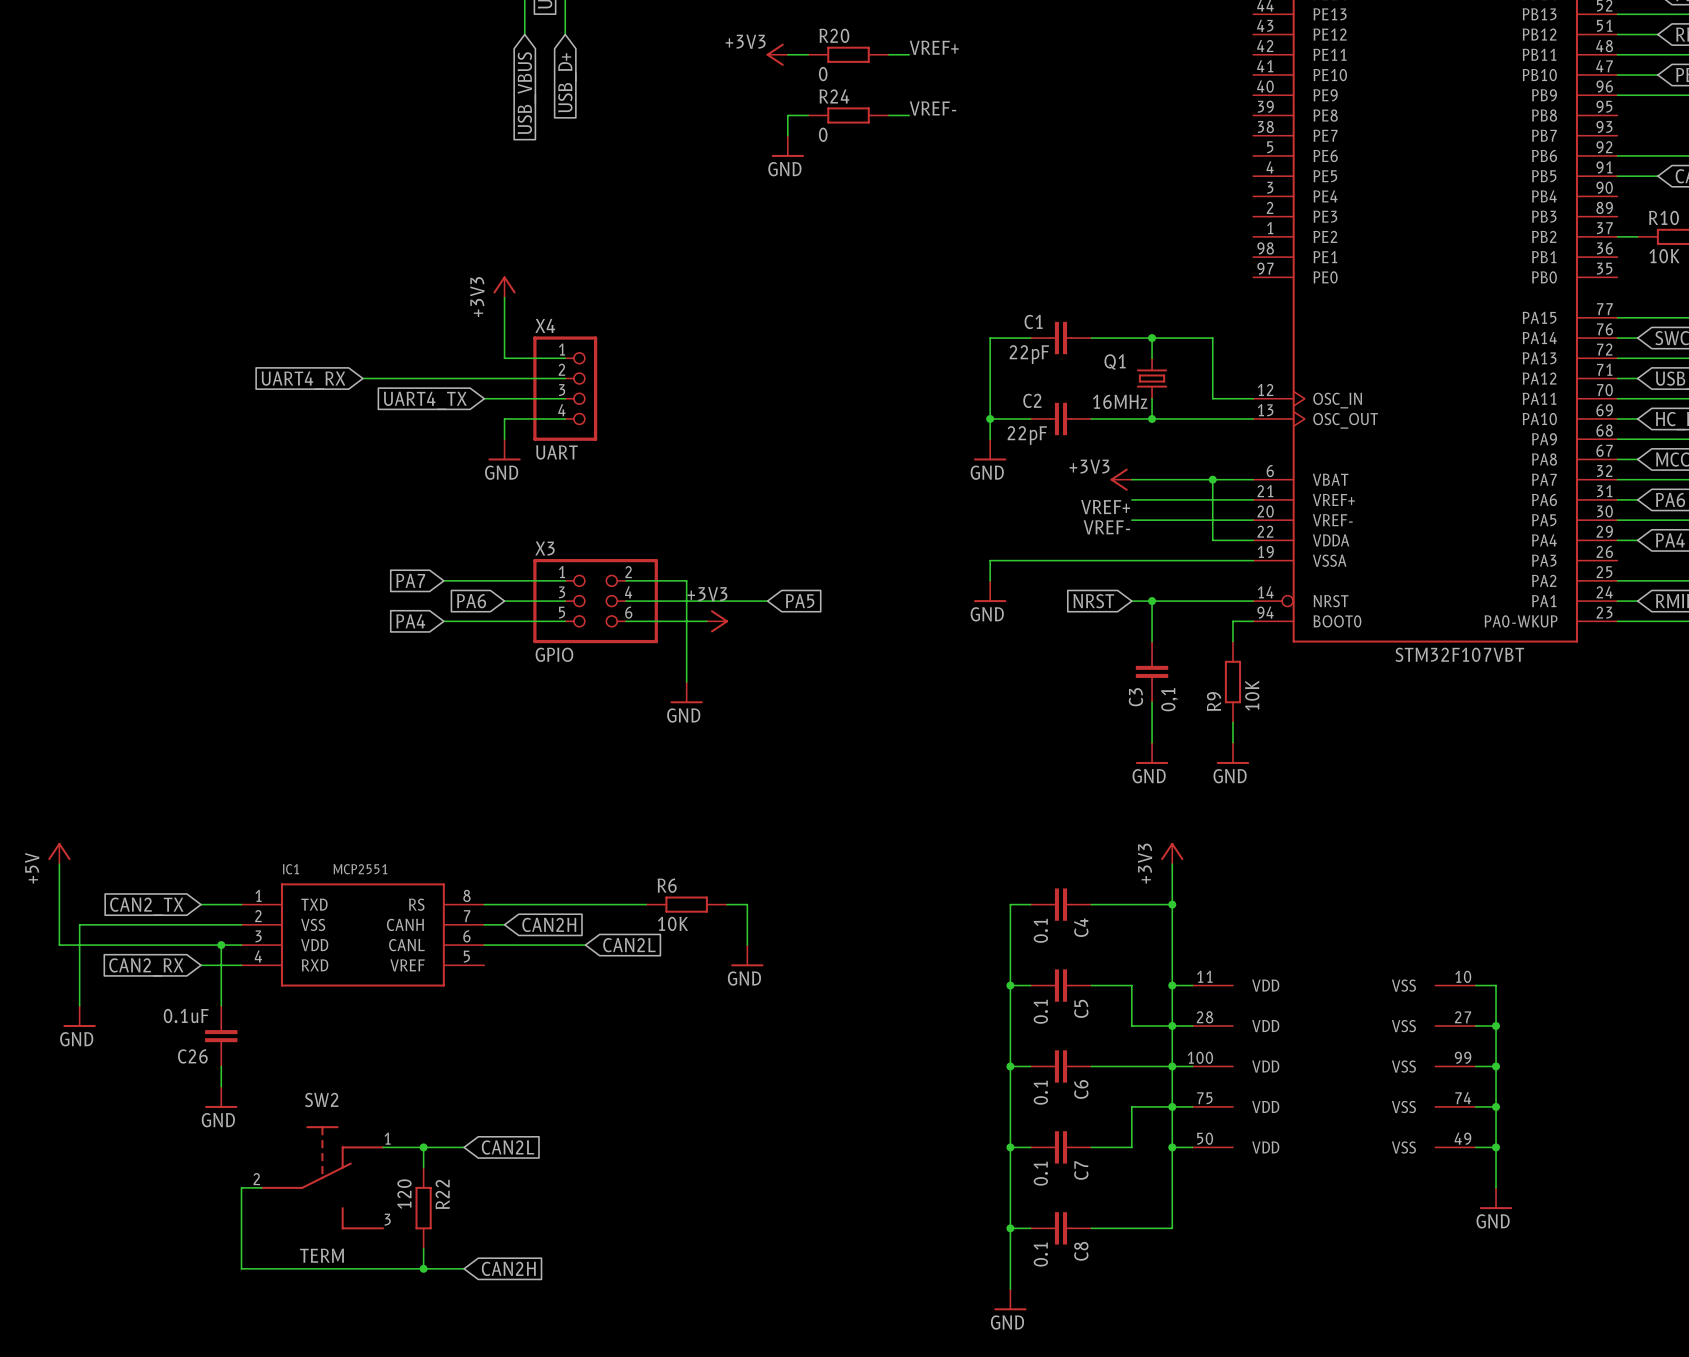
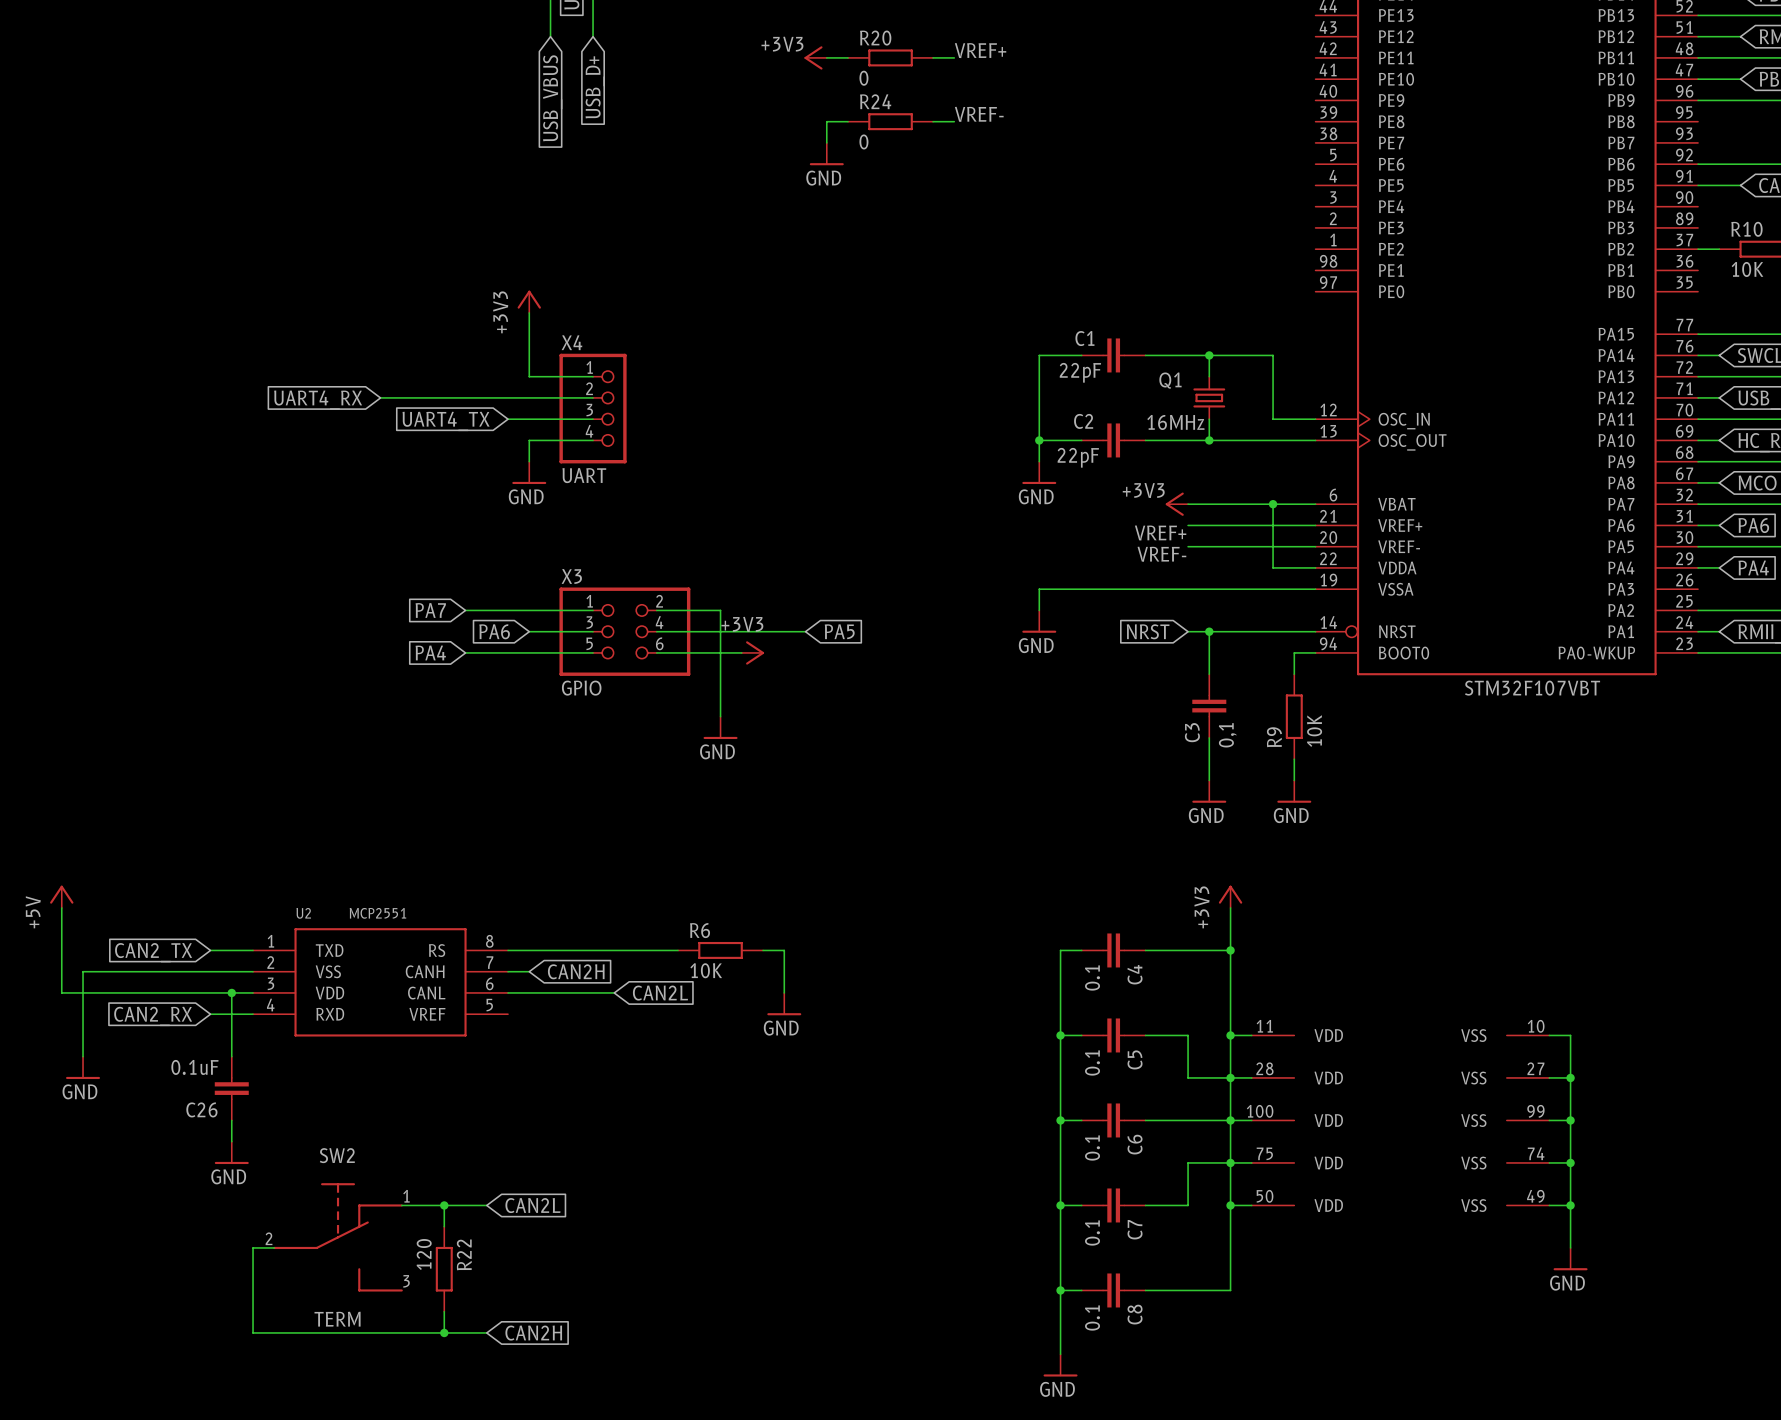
IC1 name: IC1 (290, 869) -> U2 (303, 913)

